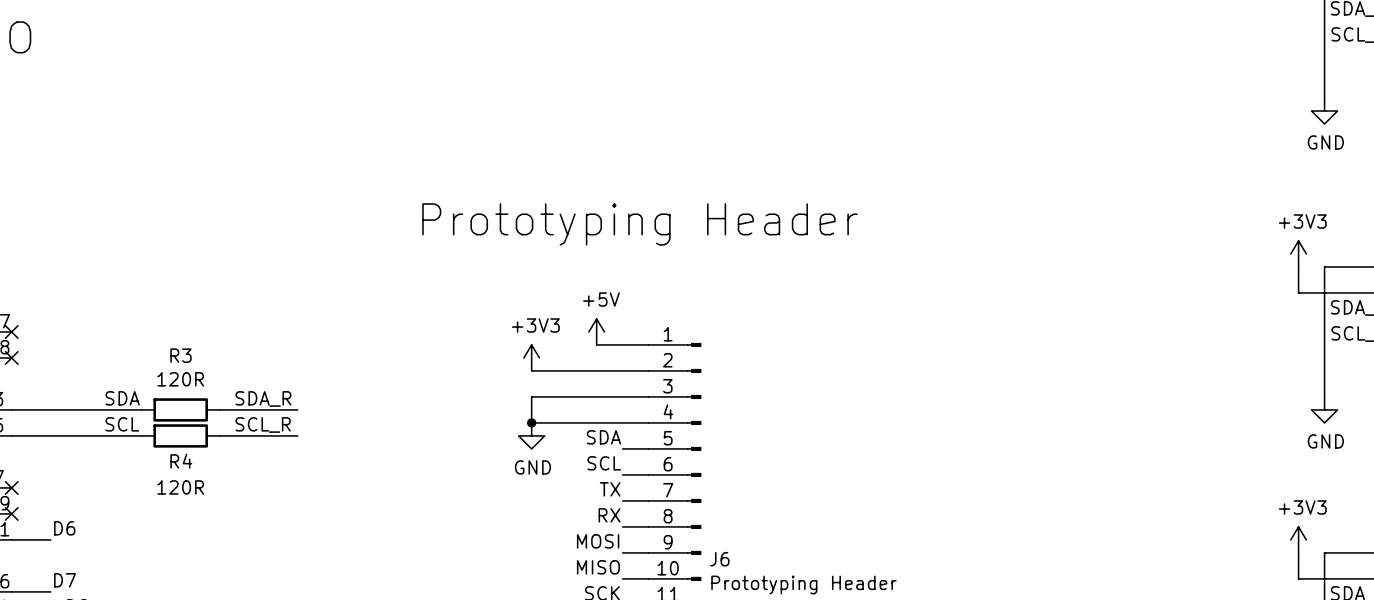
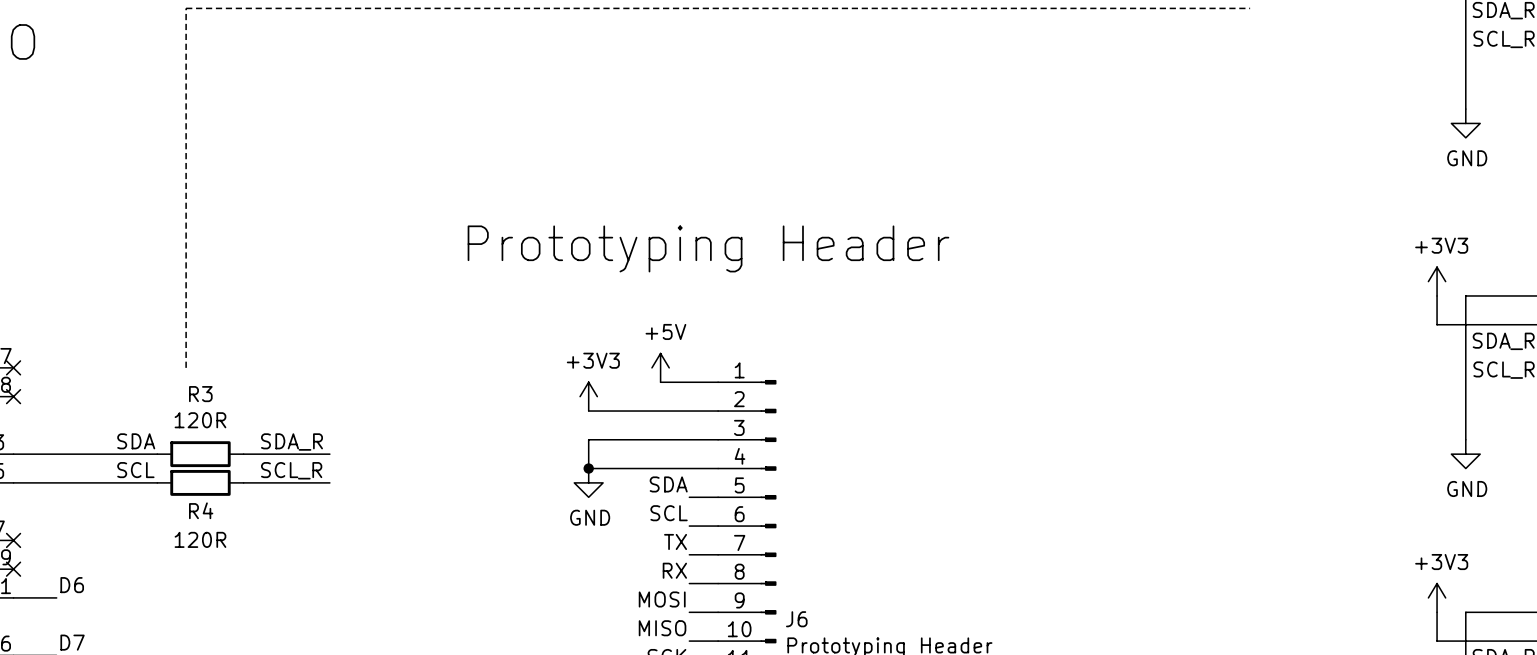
line: none -> (1250, 8) (186, 8) (186, 367)

